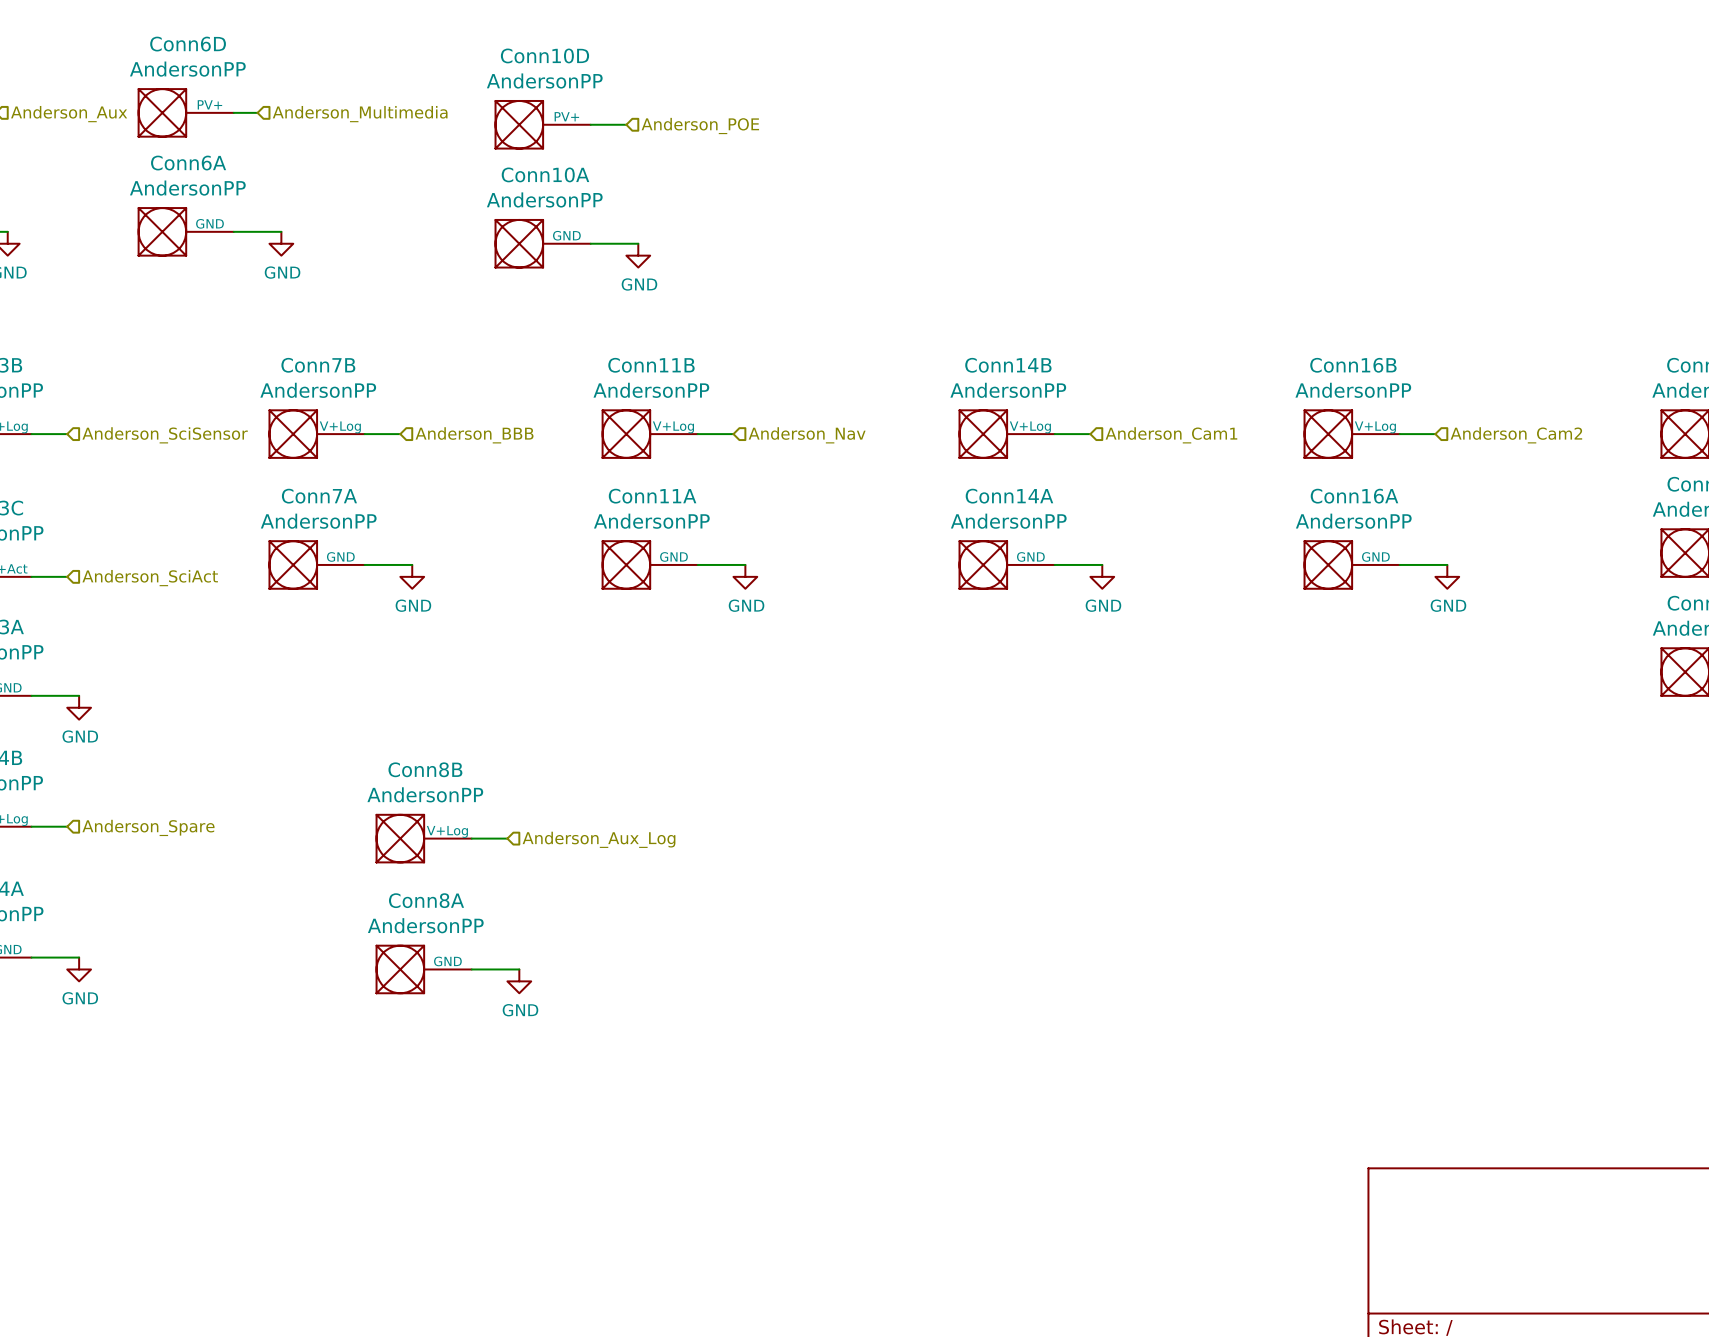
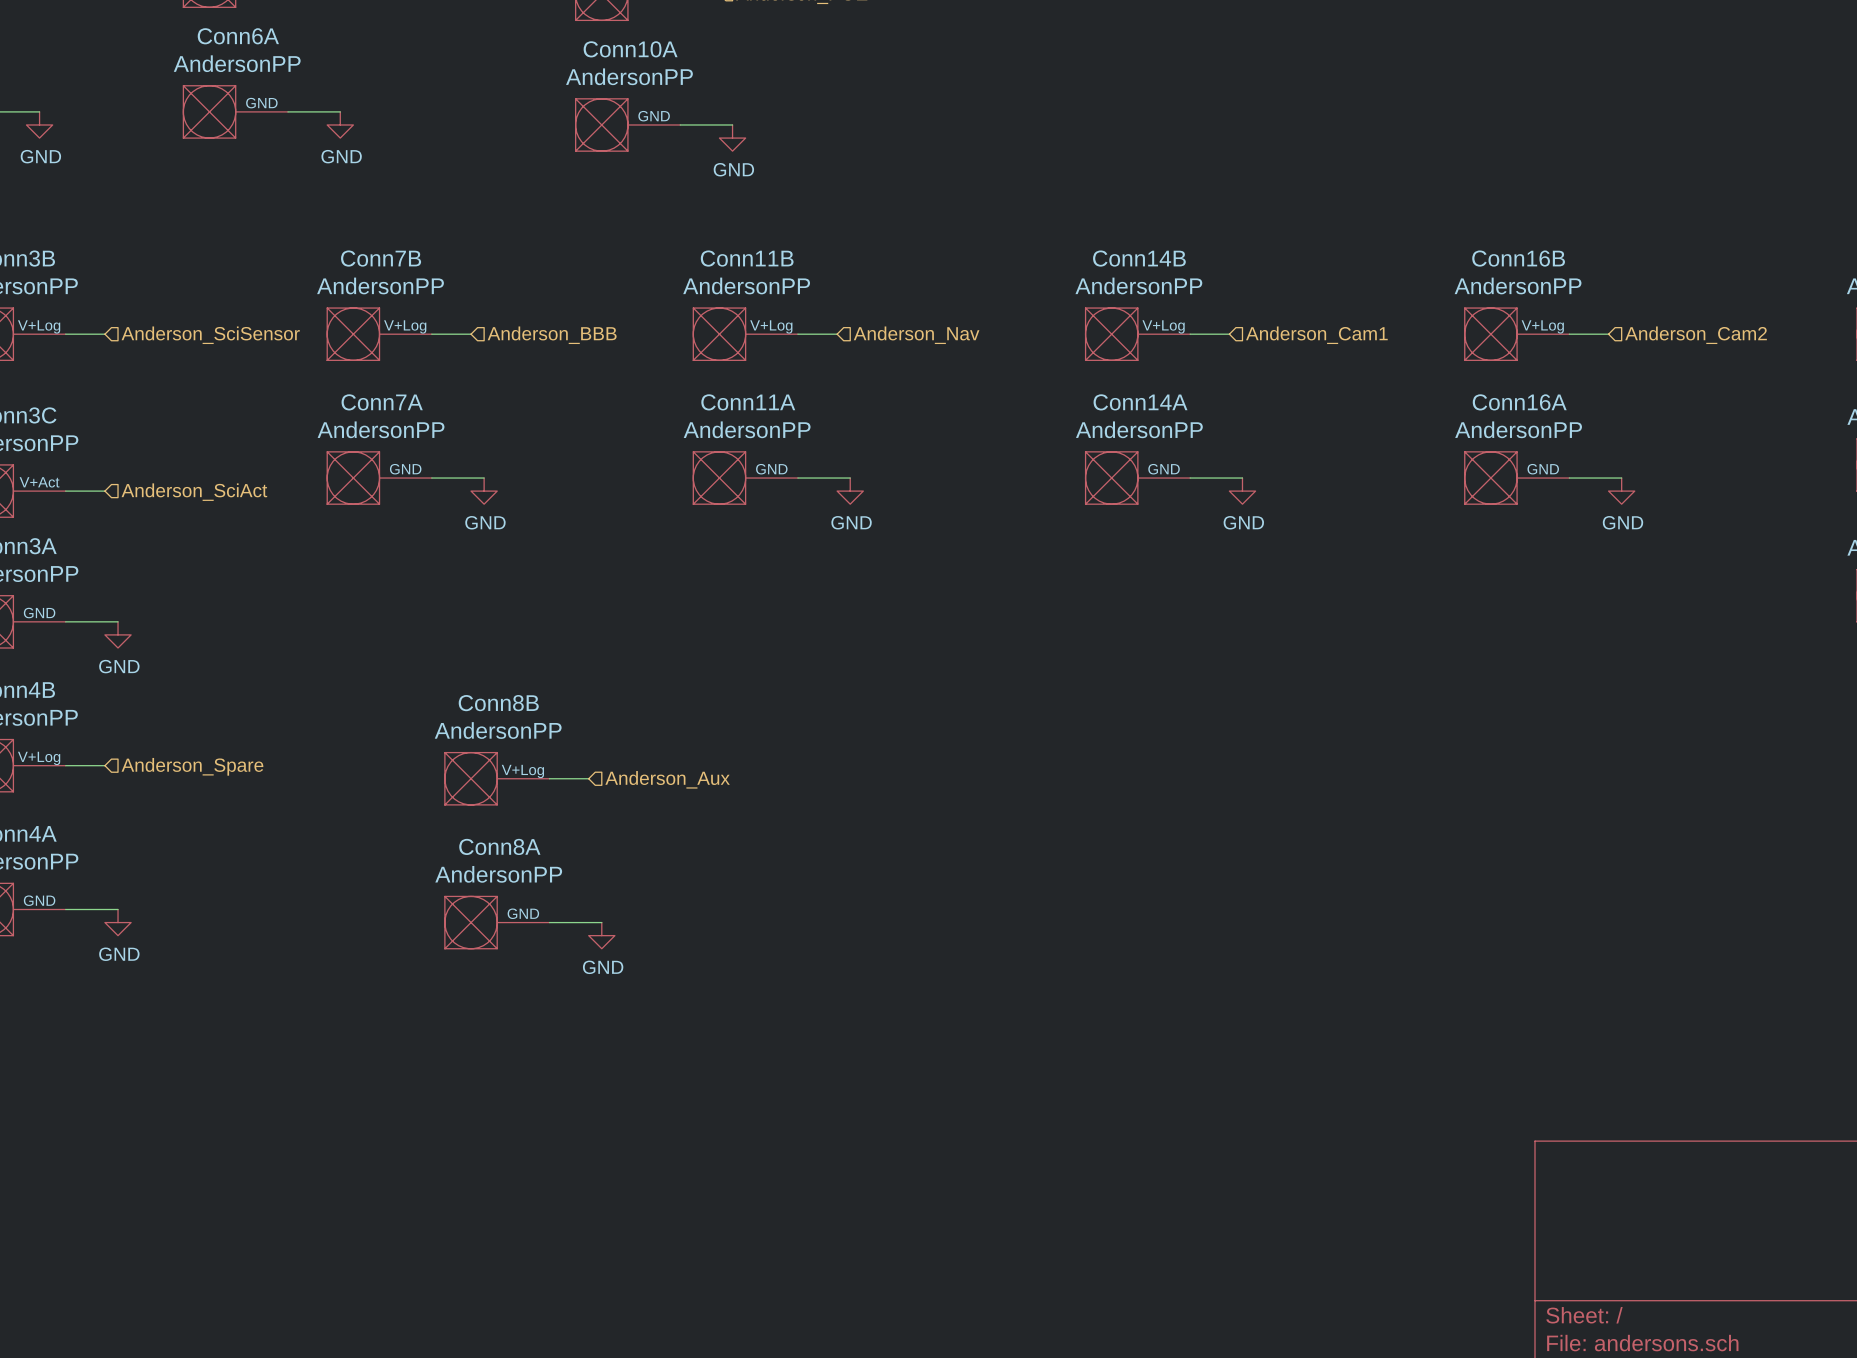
hierarchical label: Anderson_Aux_Log (599, 839) -> Anderson_Aux (667, 779)

